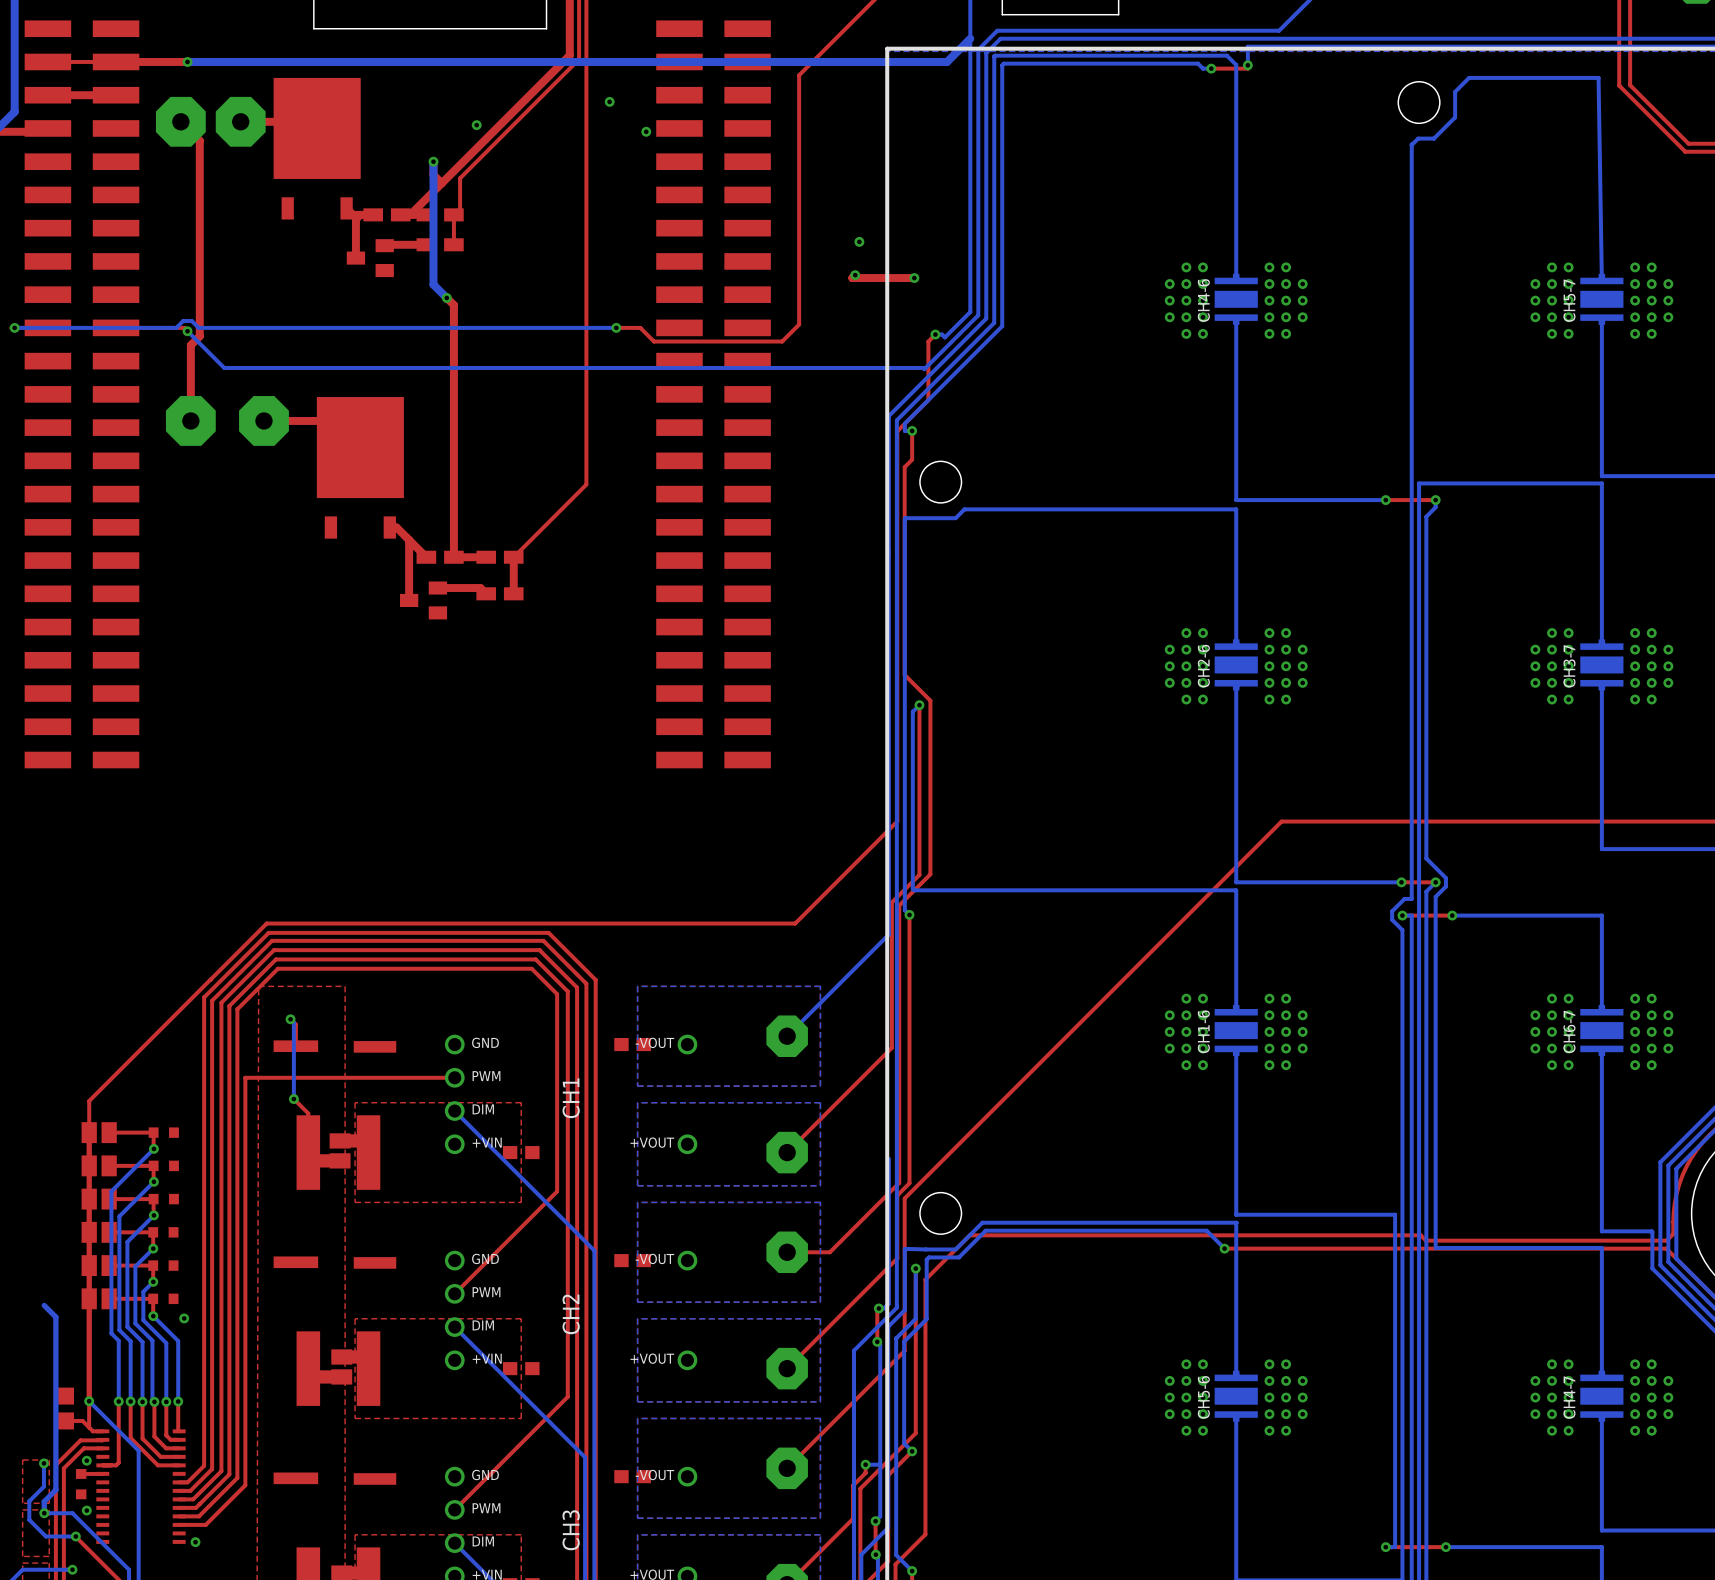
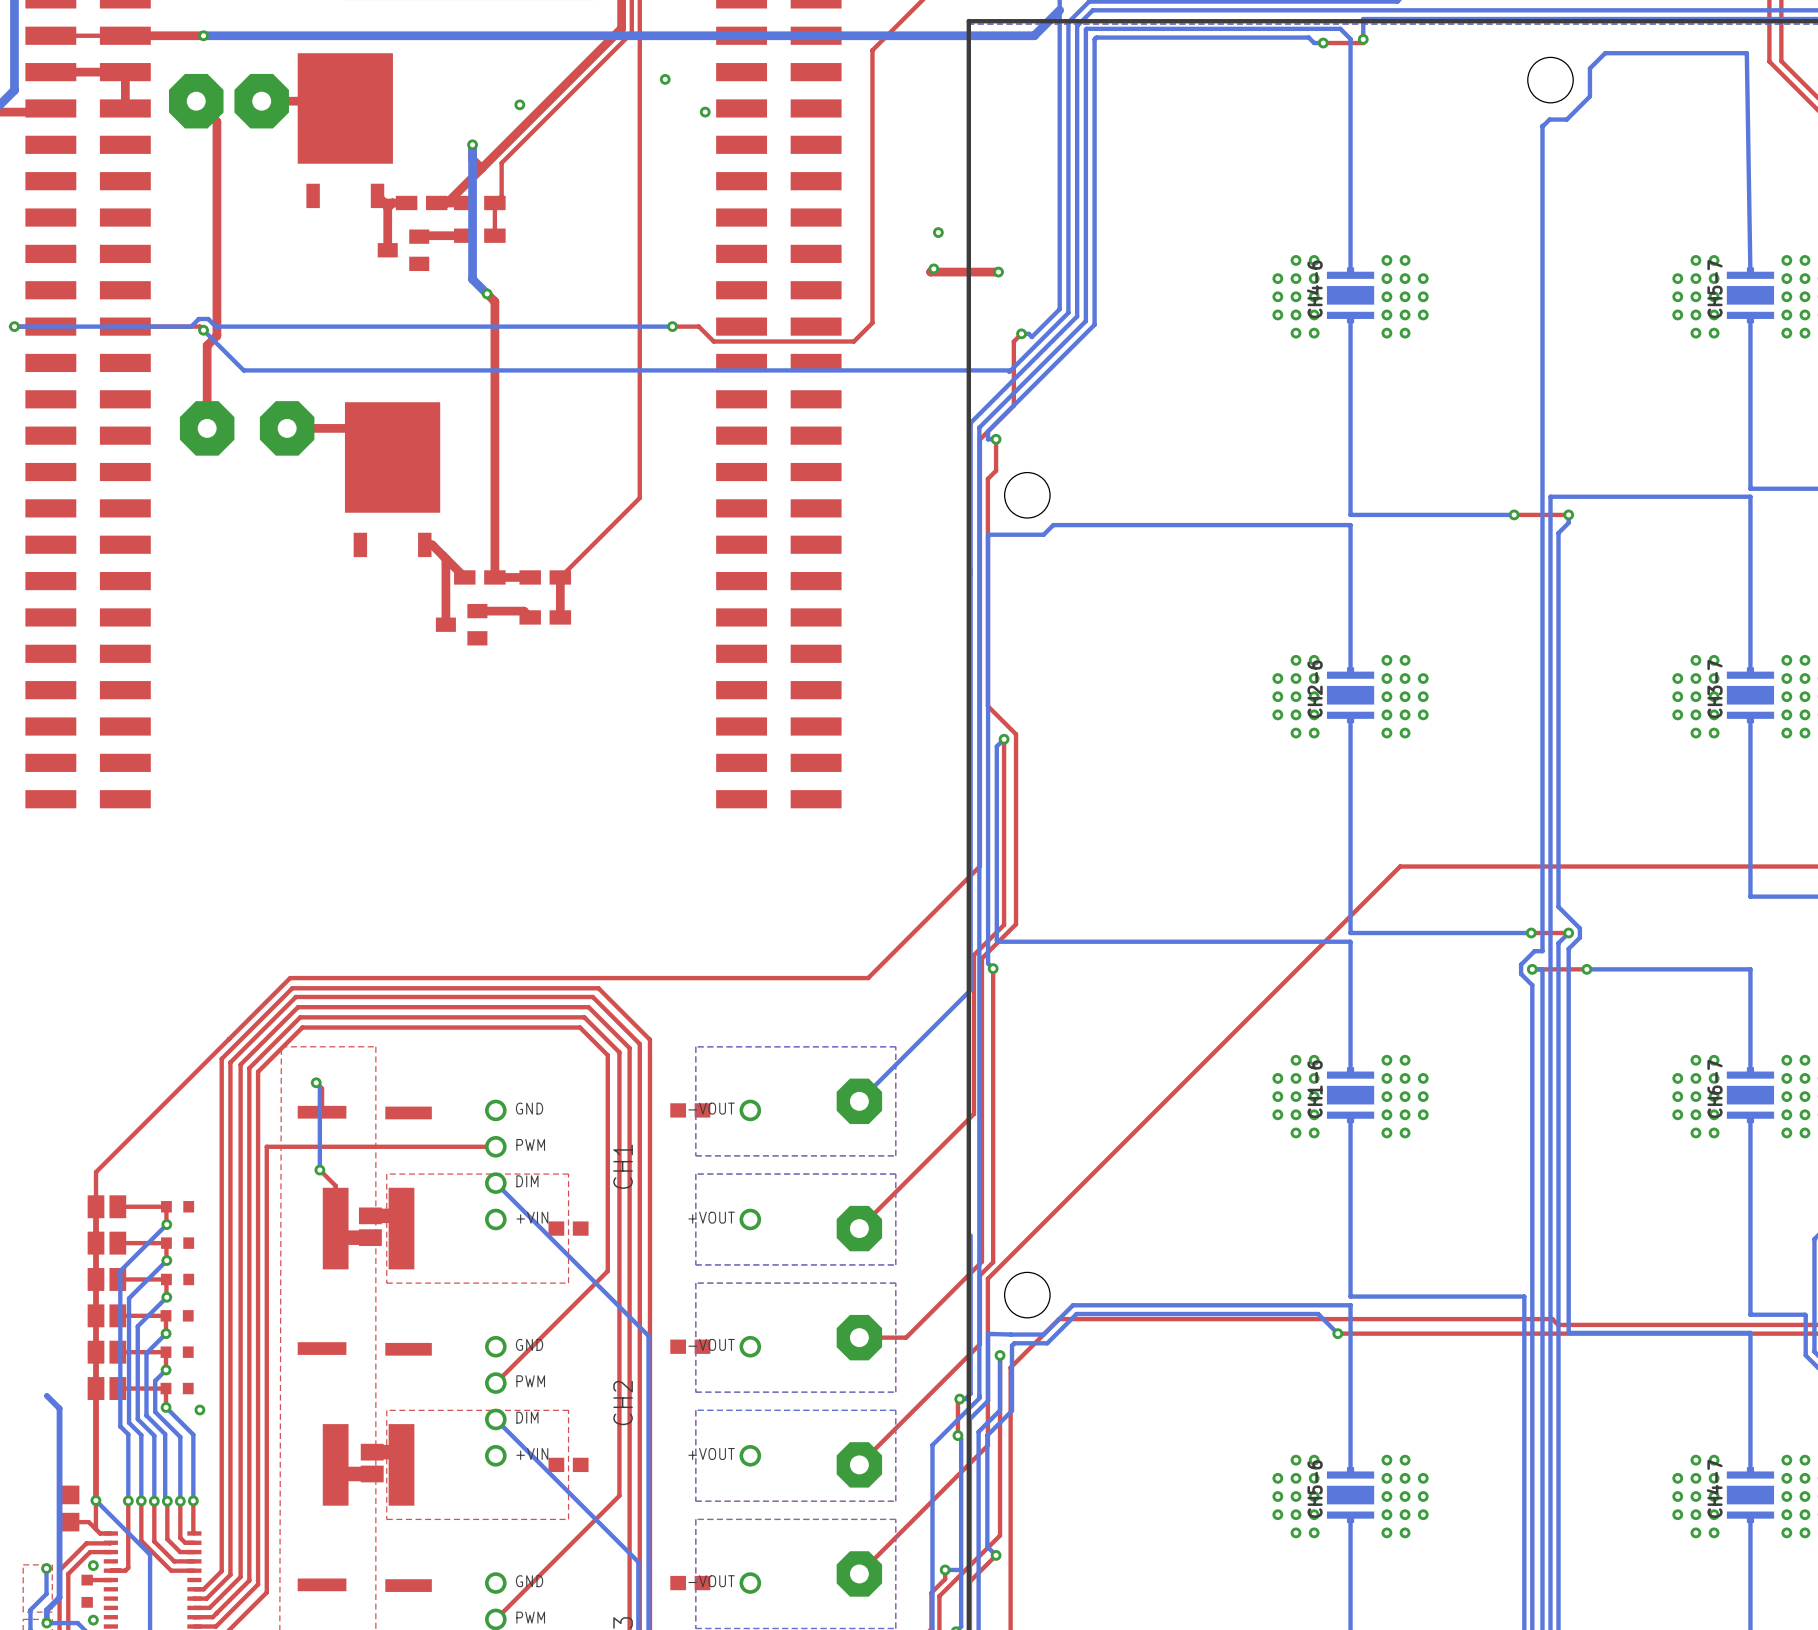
top track: none -> (125, 72) (125, 108)

